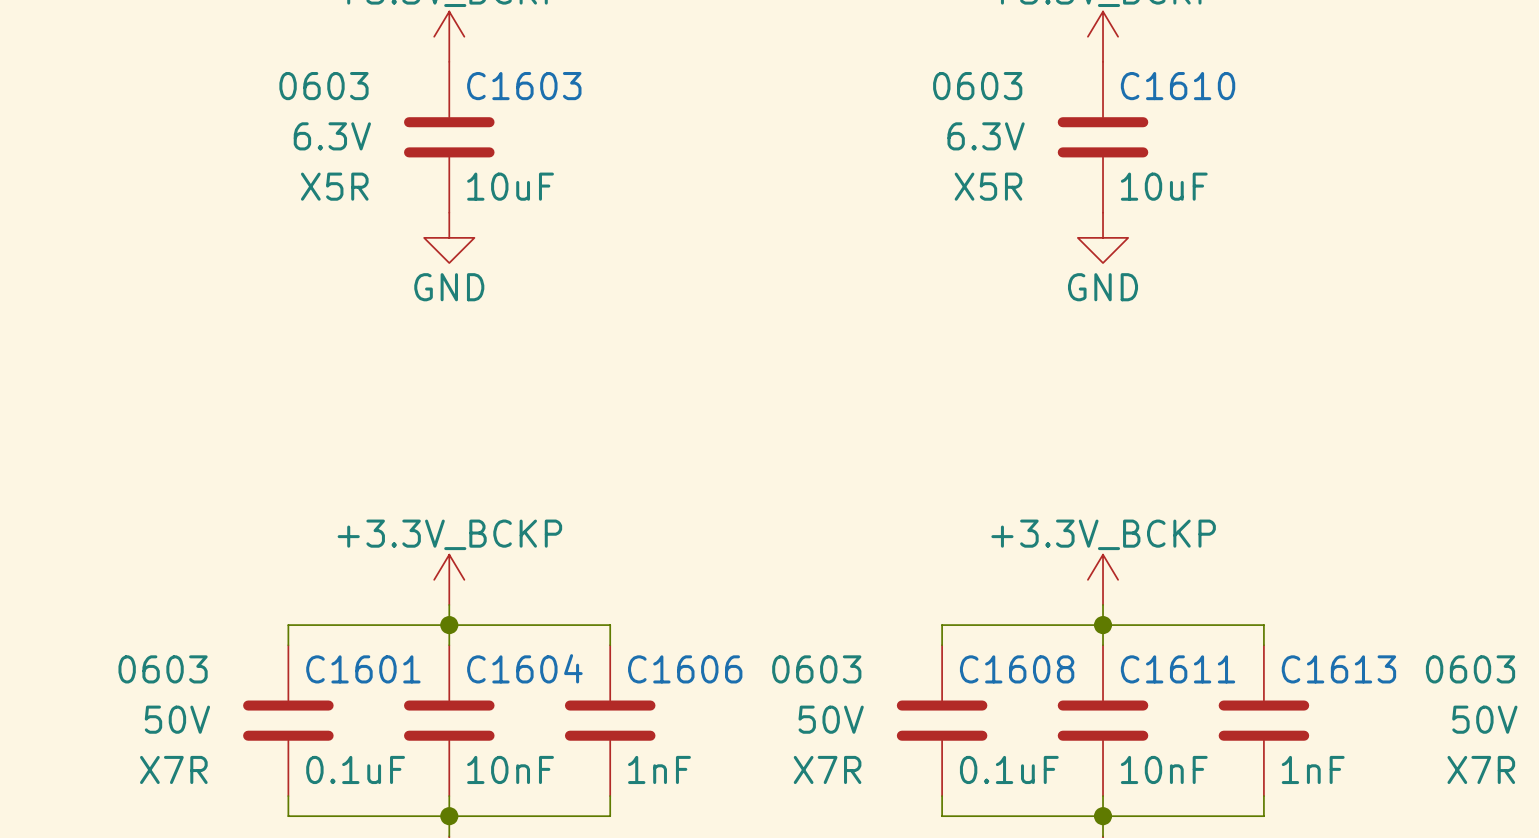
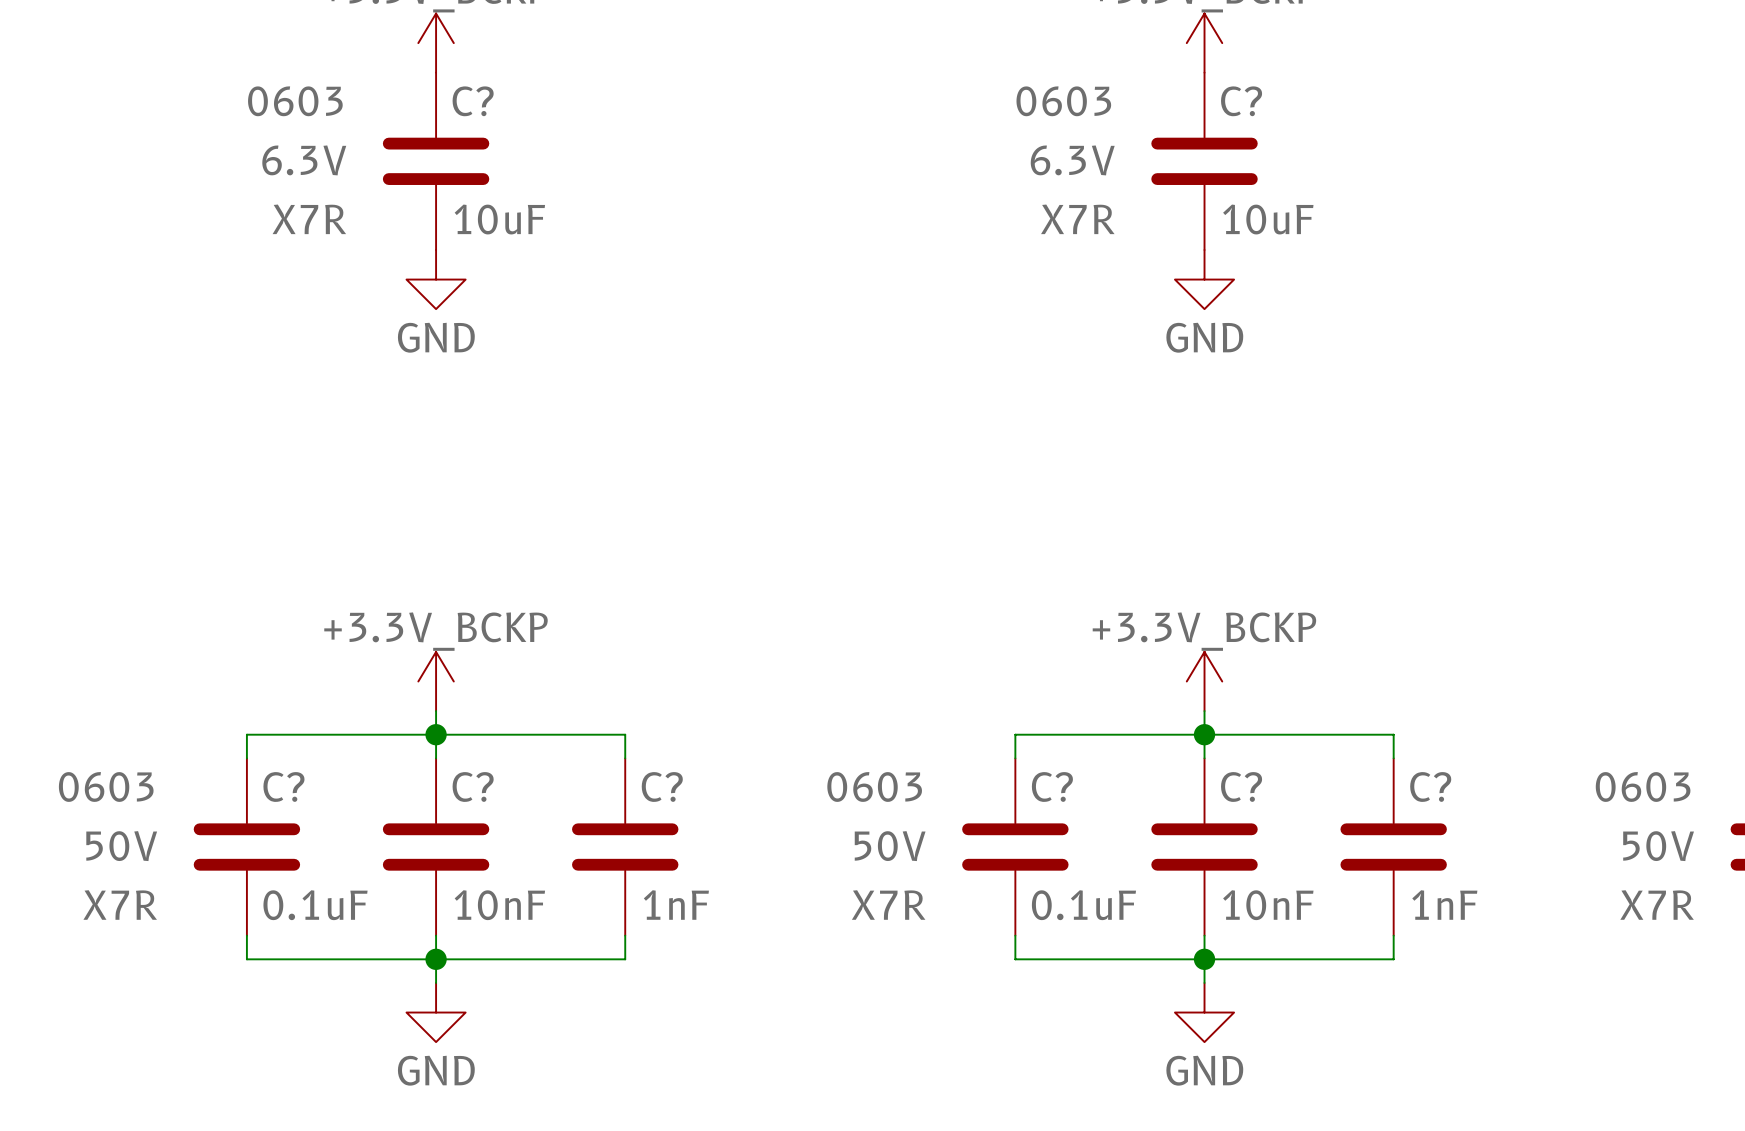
C1603 name: C1603 (524, 86) -> C? (473, 101)
C1610 name: C1610 (1178, 86) -> C? (1241, 101)
C1603 text: X5R (334, 186) -> X7R (309, 219)
C1610 text: X5R (988, 186) -> X7R (1077, 219)
C1604 name: C1604 (524, 668) -> C? (473, 786)
C1601 name: C1601 (363, 669) -> C? (283, 786)
C1606 name: C1606 (685, 669) -> C? (662, 786)
C1608 name: C1608 (1017, 669) -> C? (1052, 786)
C1611 name: C1611 (1178, 669) -> C? (1241, 786)
C1613 name: C1613 (1338, 669) -> C? (1430, 786)

